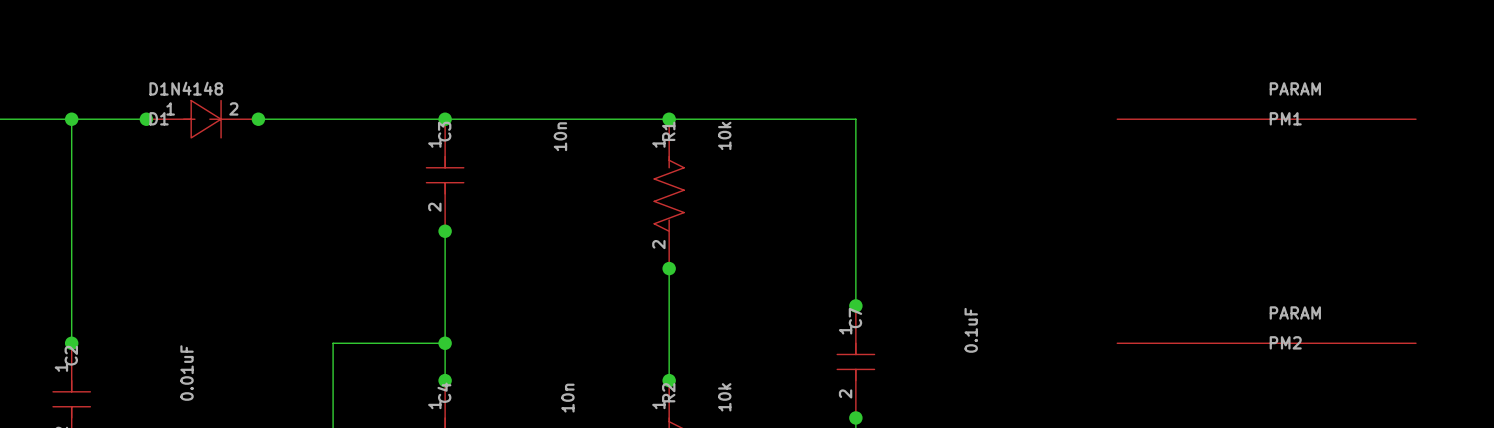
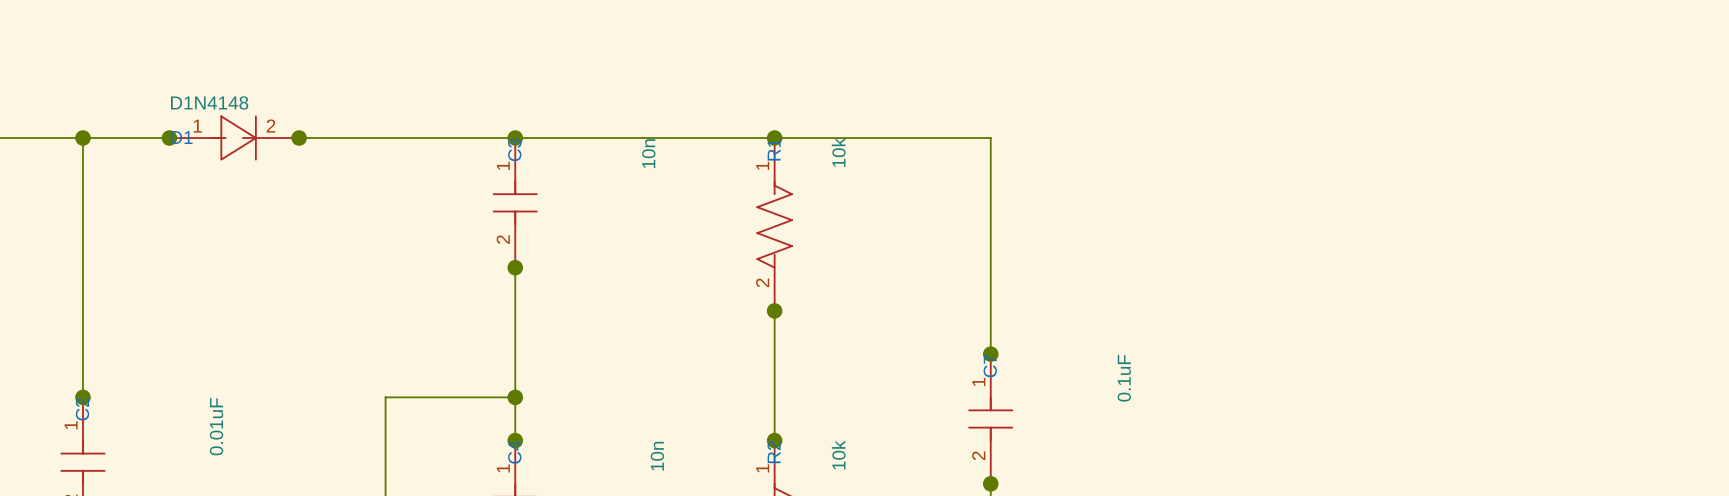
PM1: PARAM (1266, 119) -> none
PM2: PARAM (1266, 343) -> none

